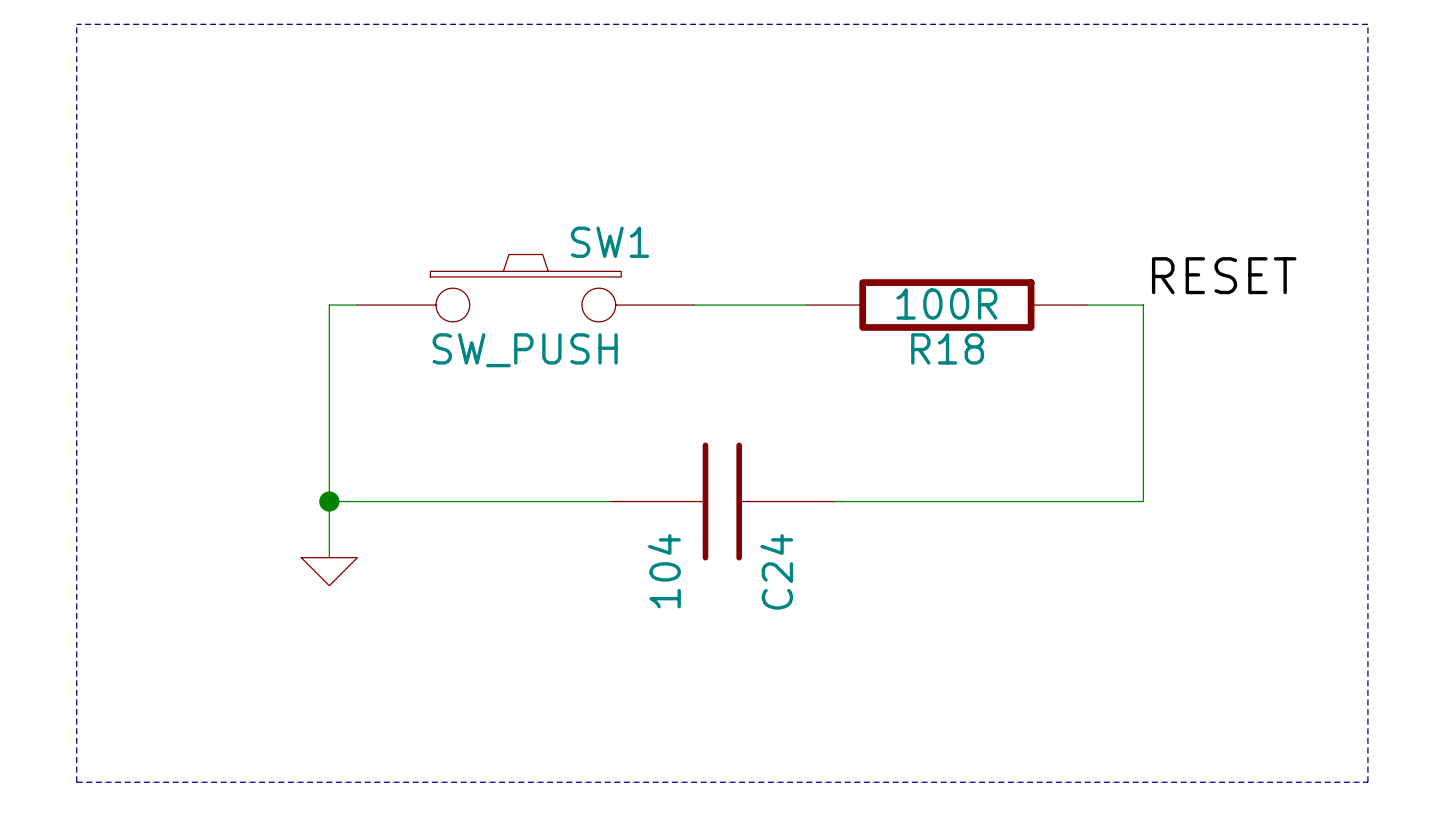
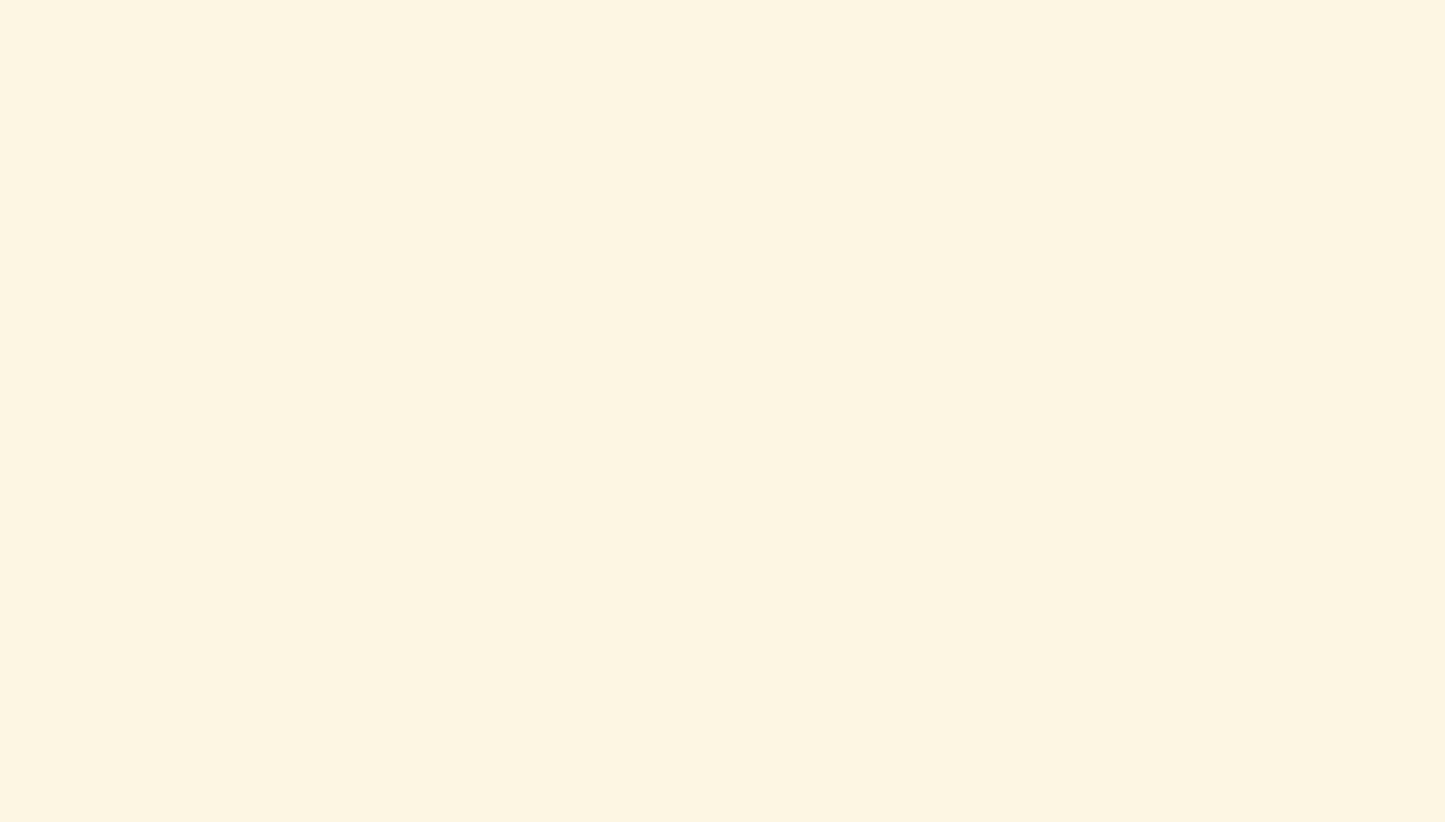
line: (76, 24) (76, 782) (1367, 782) (1367, 24) (76, 24) -> none
label: RESET (1224, 275) -> none
SW1: SW_PUSH (525, 288) -> none
wire: (357, 305) (329, 305) (329, 557) -> none
wire: (694, 305) (806, 305) -> none
R18: 100R (946, 305) -> none
wire: (1087, 305) (1143, 305) (1143, 501) (834, 501) -> none
wire: (329, 501) (610, 501) -> none
junction: (329, 501) -> none
C24: 104 (722, 501) -> none
power symbol: (329, 571) -> none

